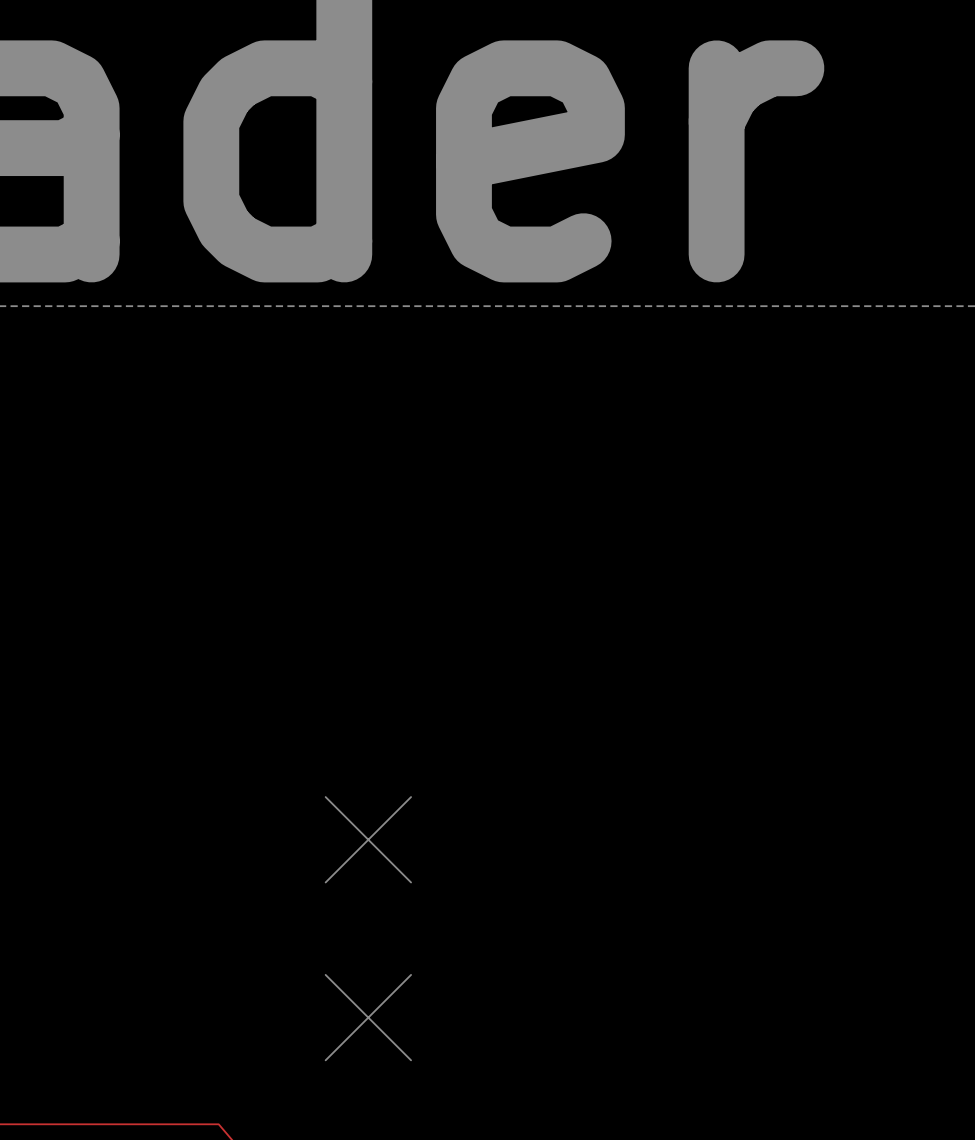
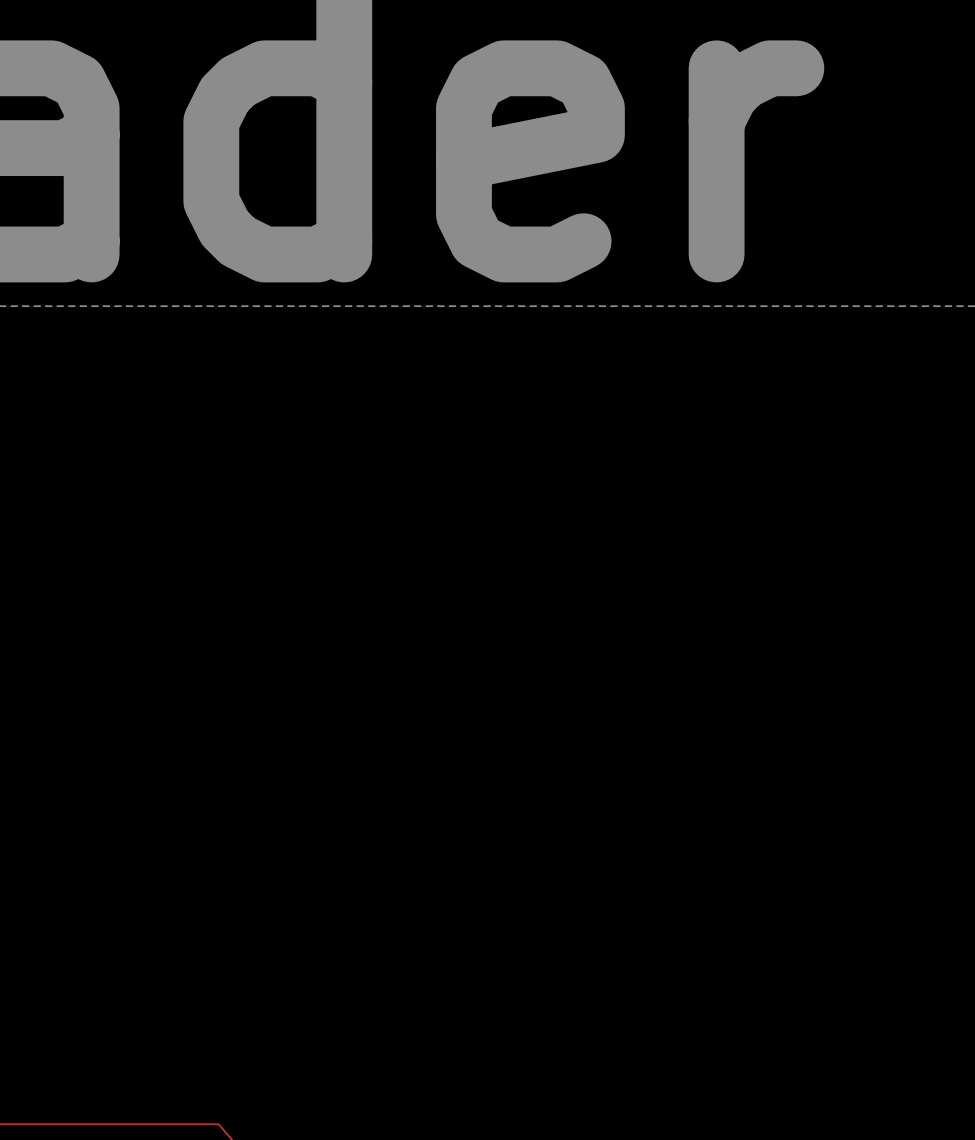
no-connect mark: (368, 839) -> none
no-connect mark: (368, 1017) -> none

